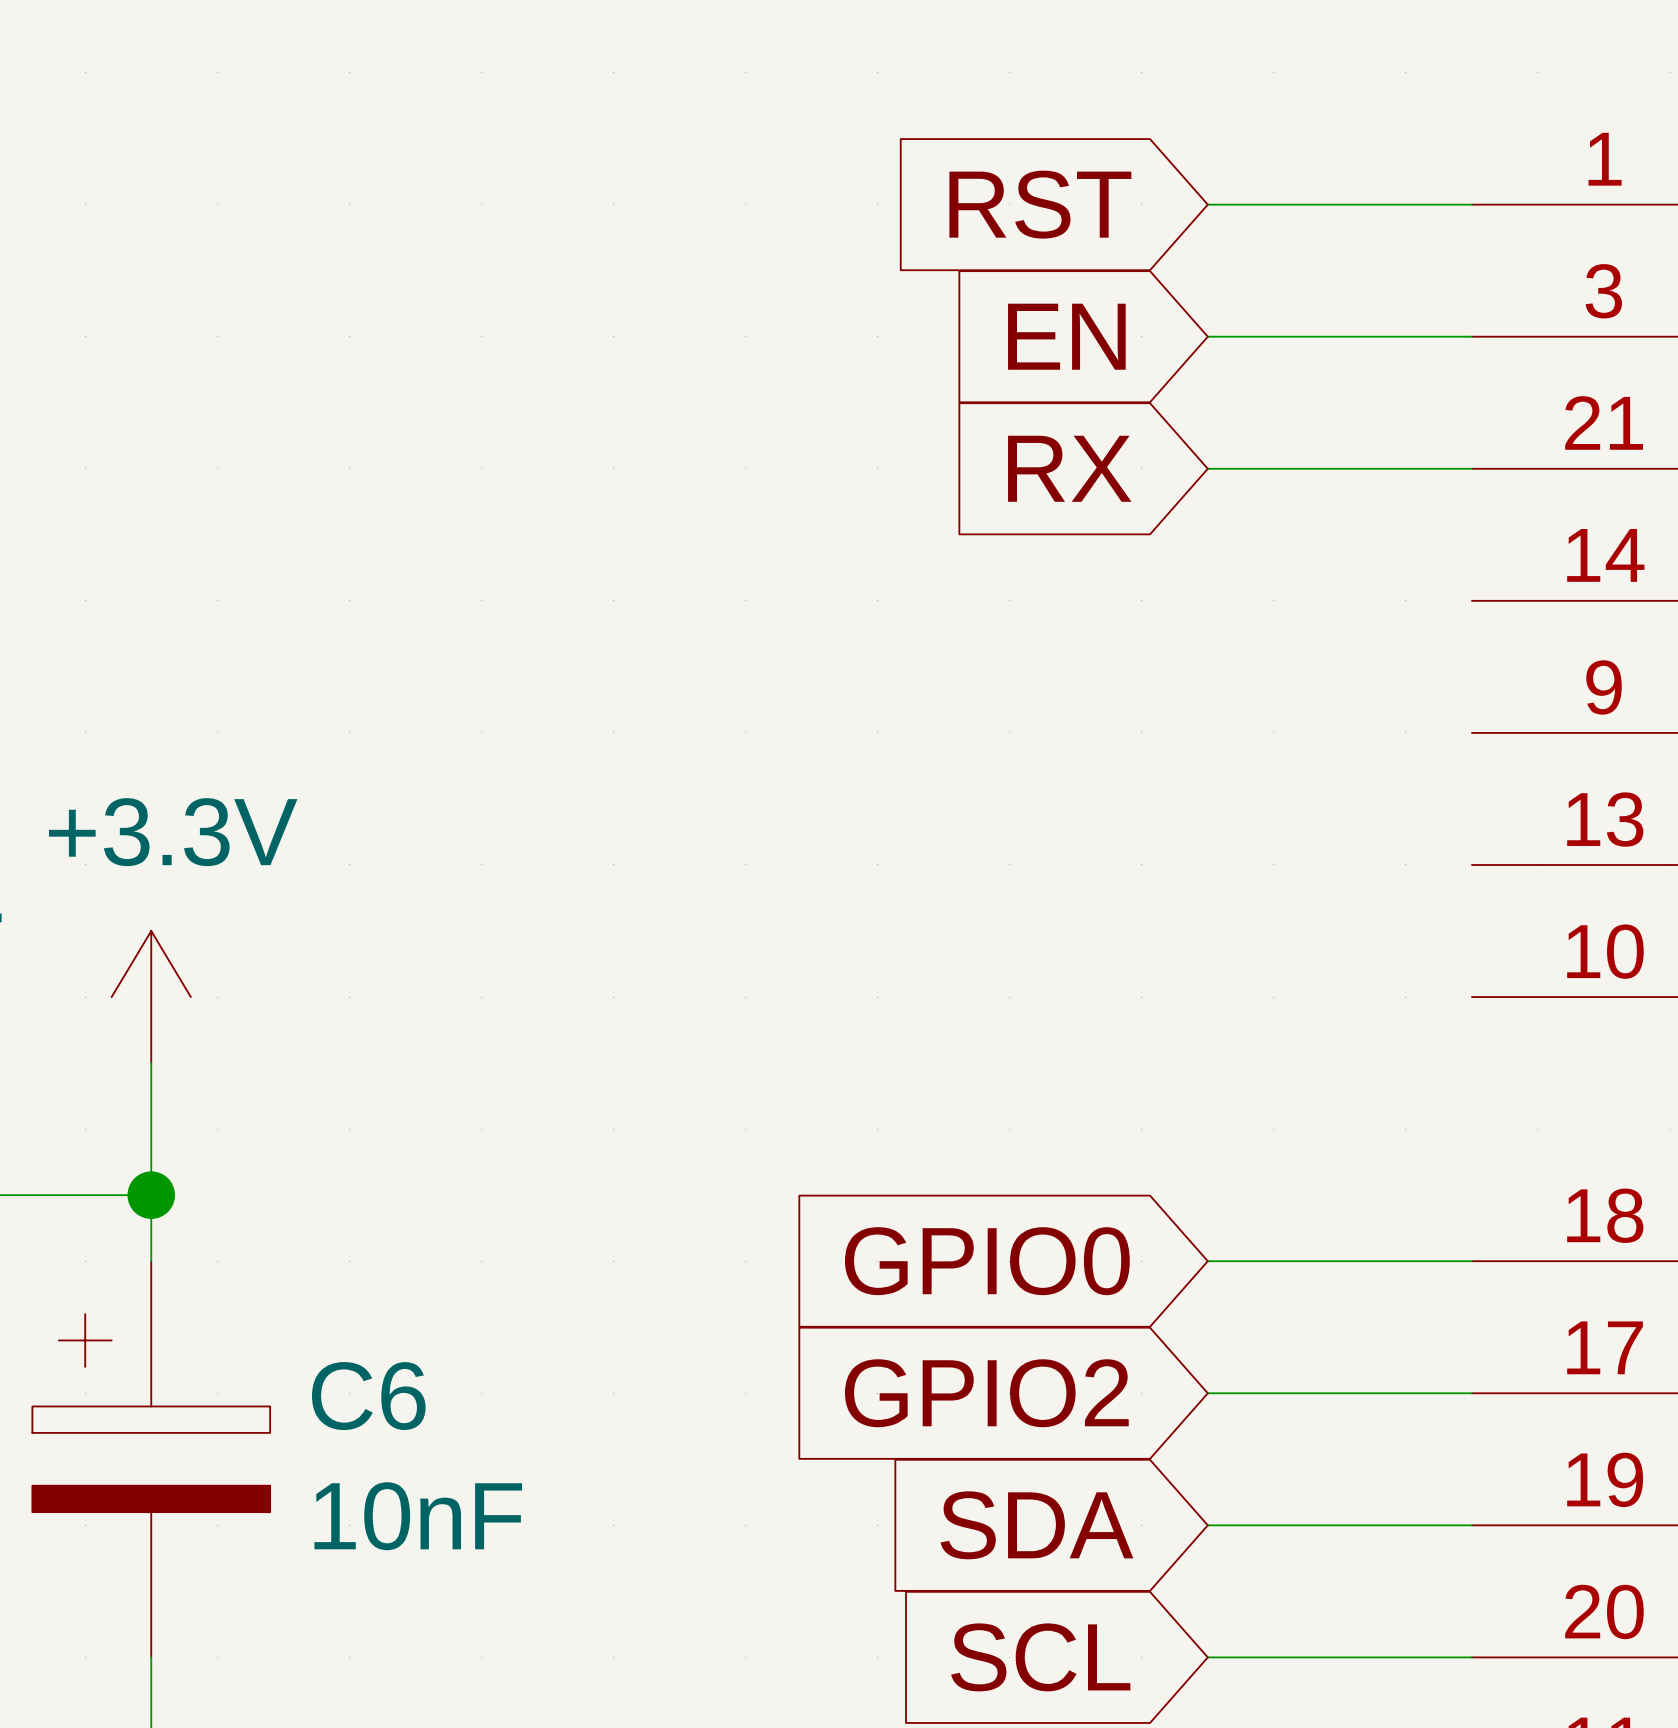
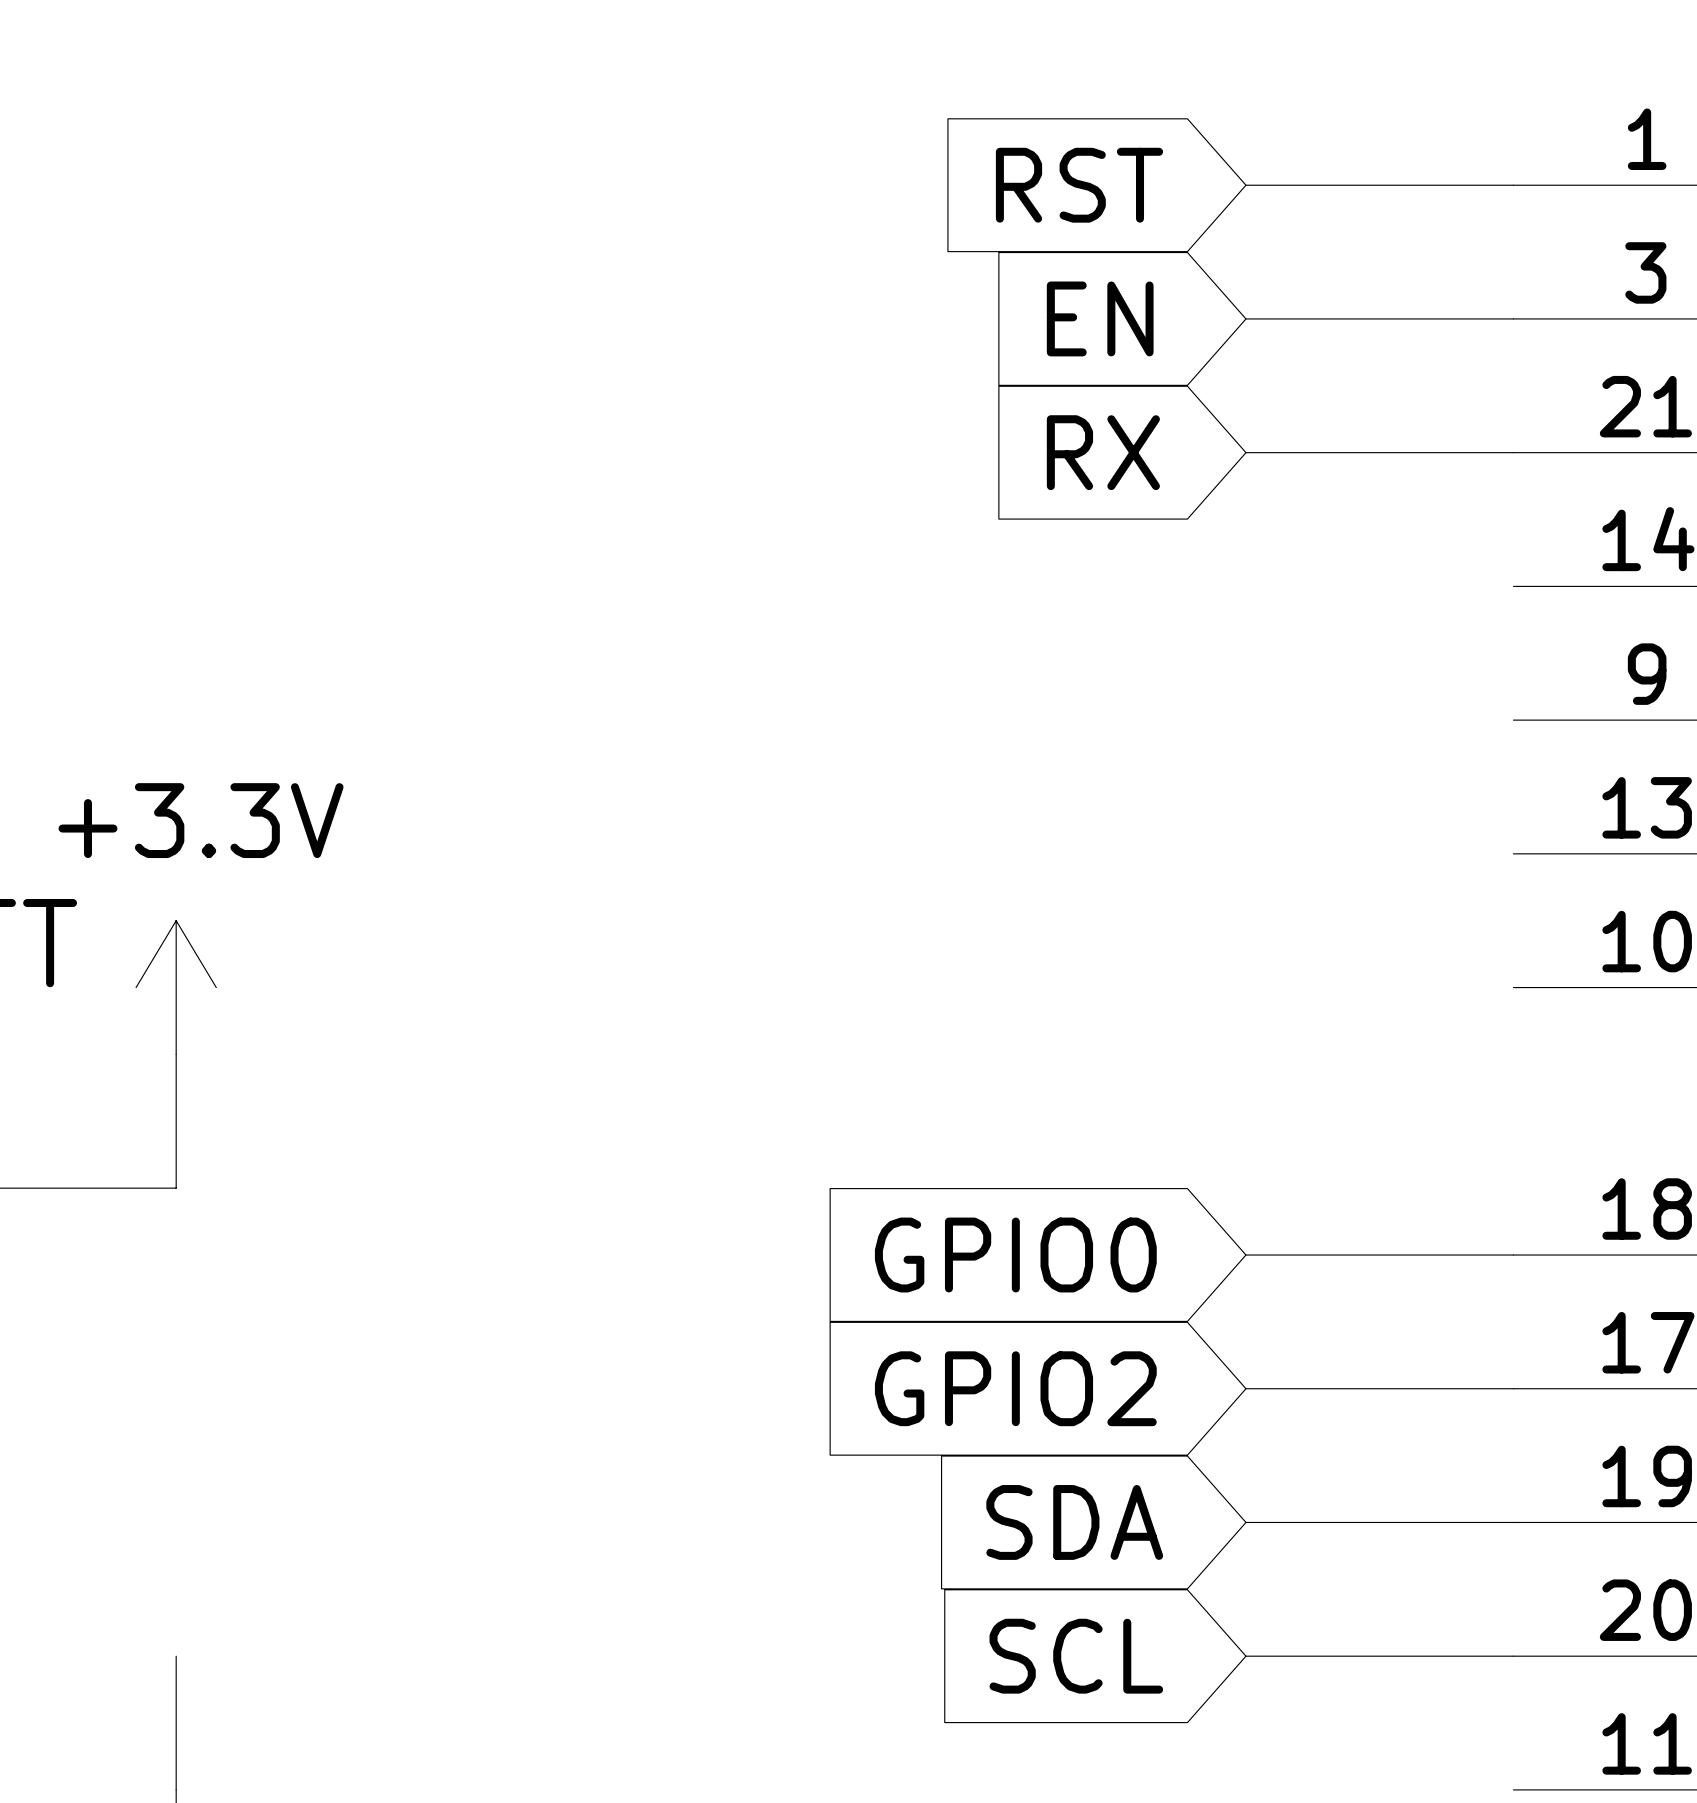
wire: (151, 1195) (151, 1261) -> none
junction: (151, 1195) -> none
C6: 10nF (151, 1459) -> none

